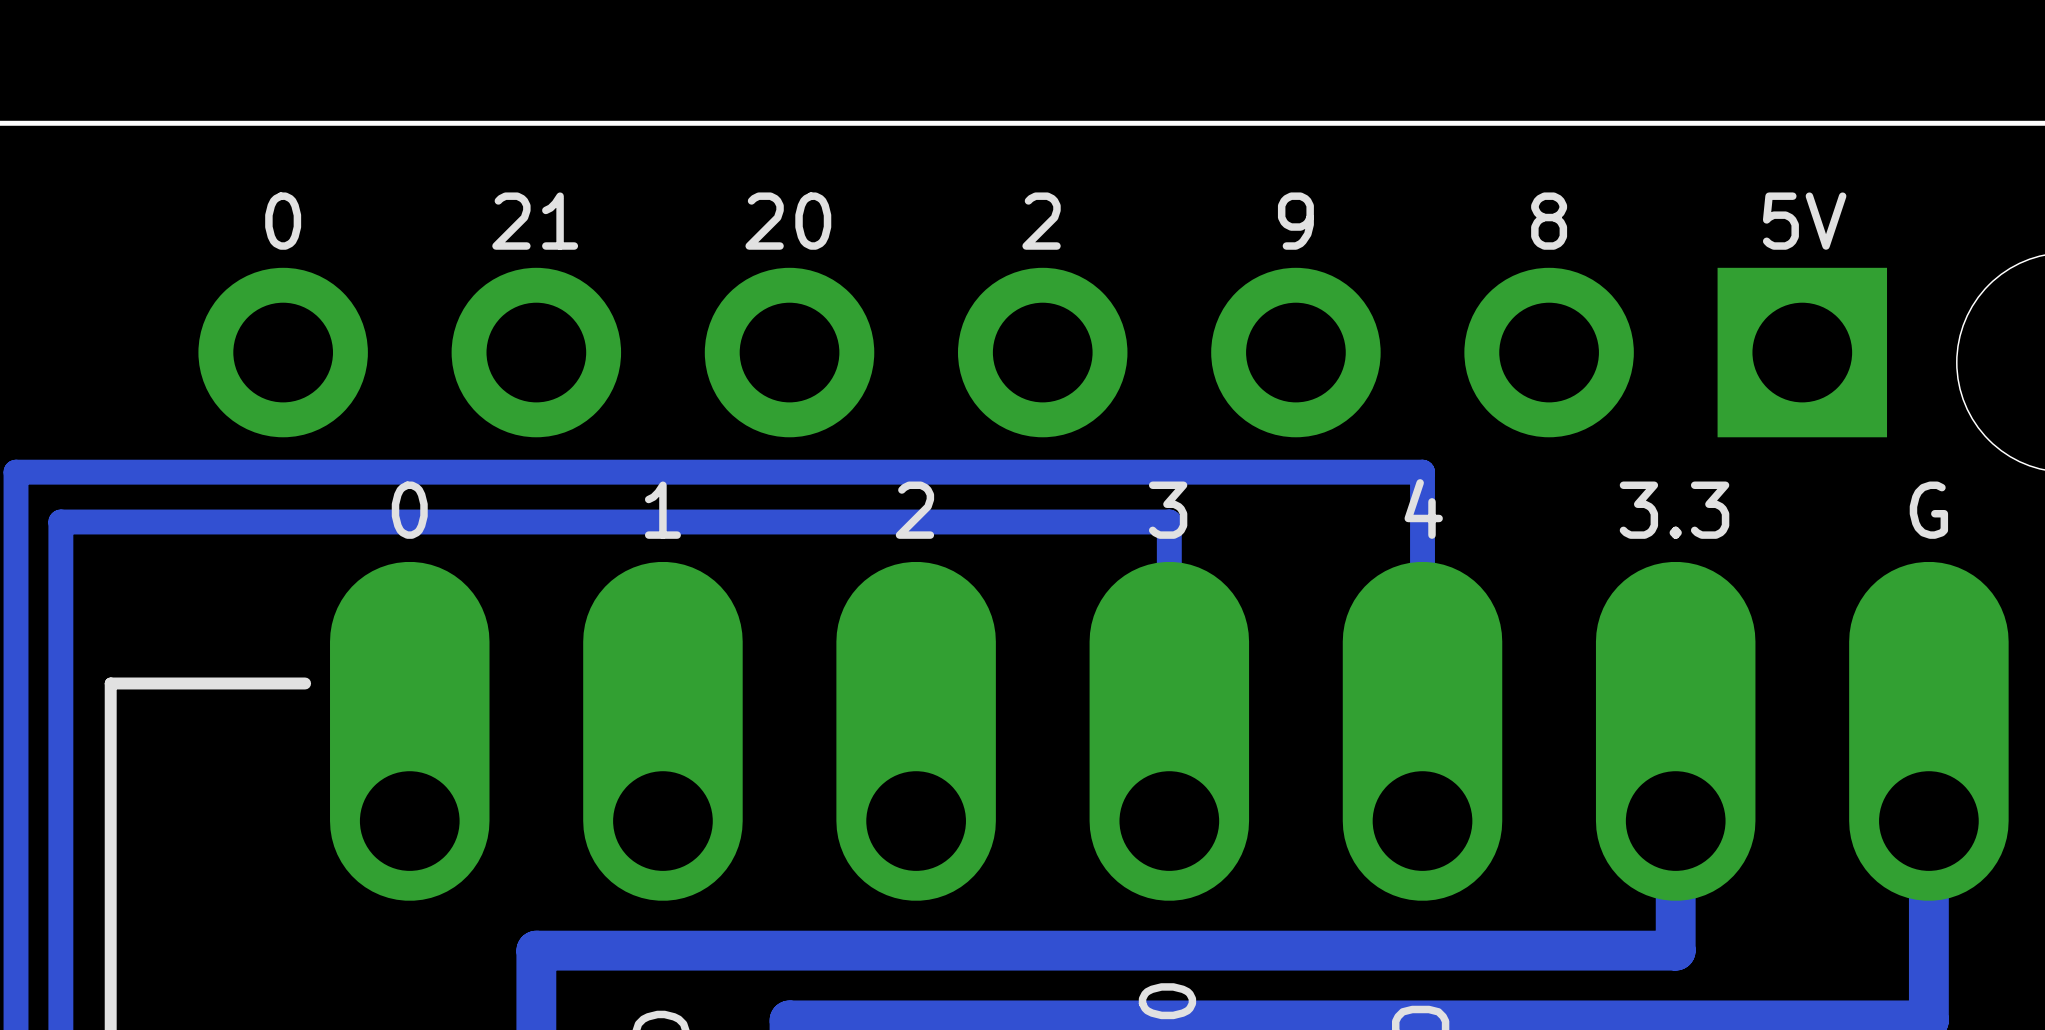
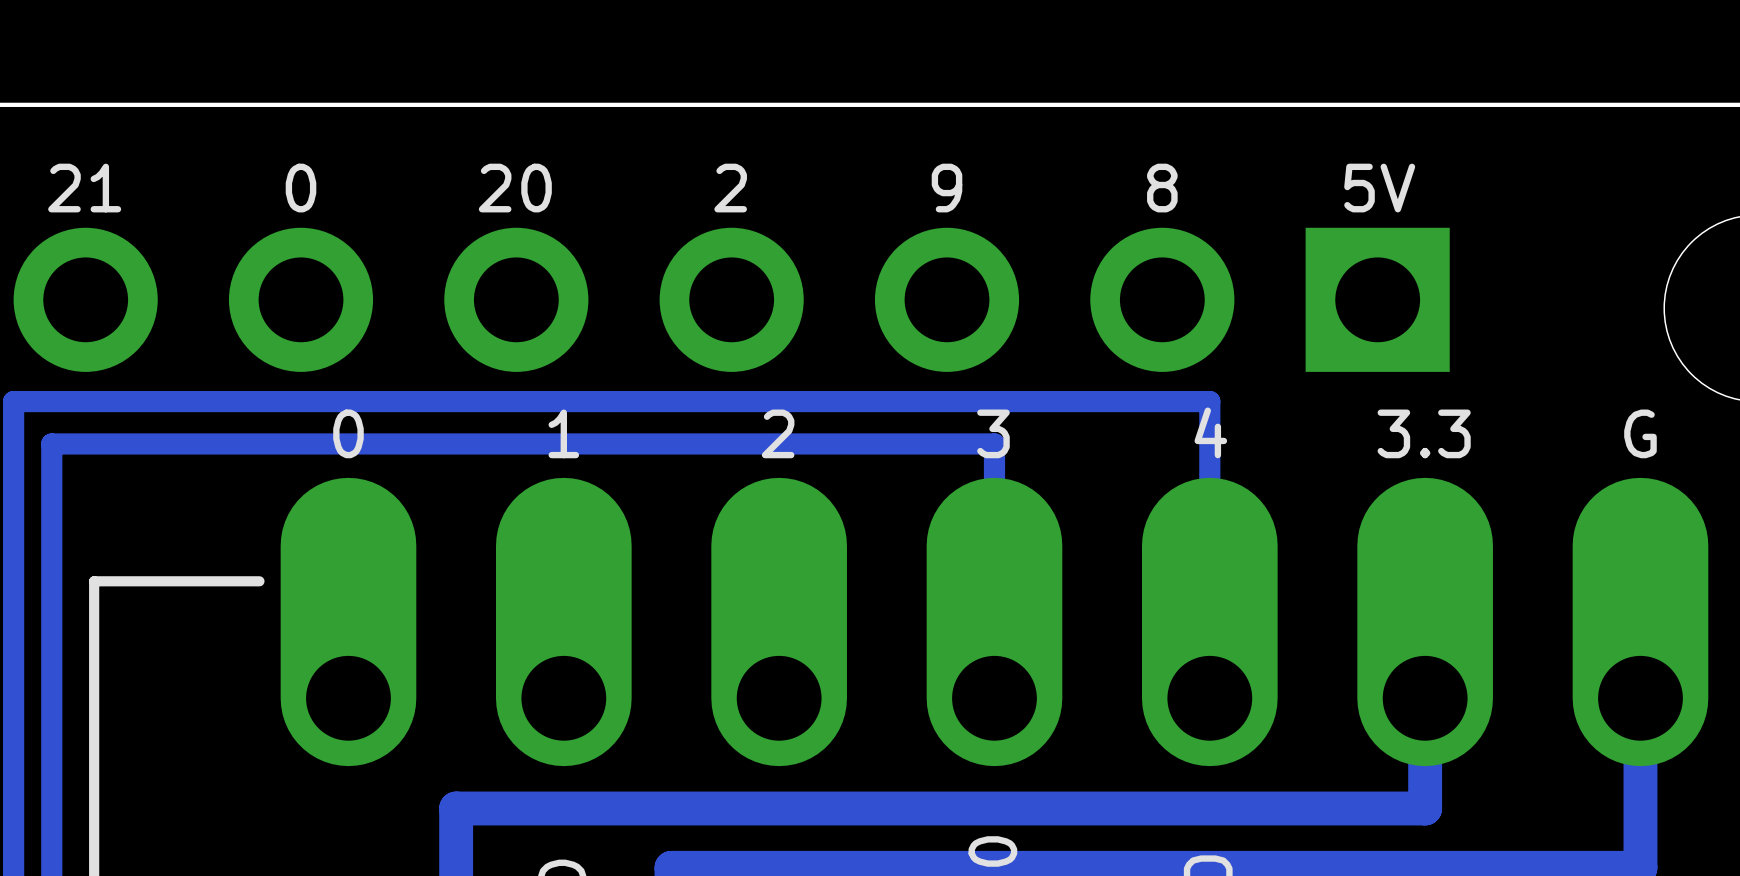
text position: 0 (283, 221) -> 0 (301, 188)
text position: 21 (535, 221) -> 21 (84, 188)
text position: 20 (788, 221) -> 20 (515, 188)
text position: 2 (1041, 221) -> 2 (730, 188)
text position: 9 (1295, 221) -> 9 (947, 188)
text position: 8 (1549, 221) -> 8 (1162, 188)
text position: 5V (1804, 221) -> 5V (1379, 188)
part position: (1042, 352) -> (731, 299)

